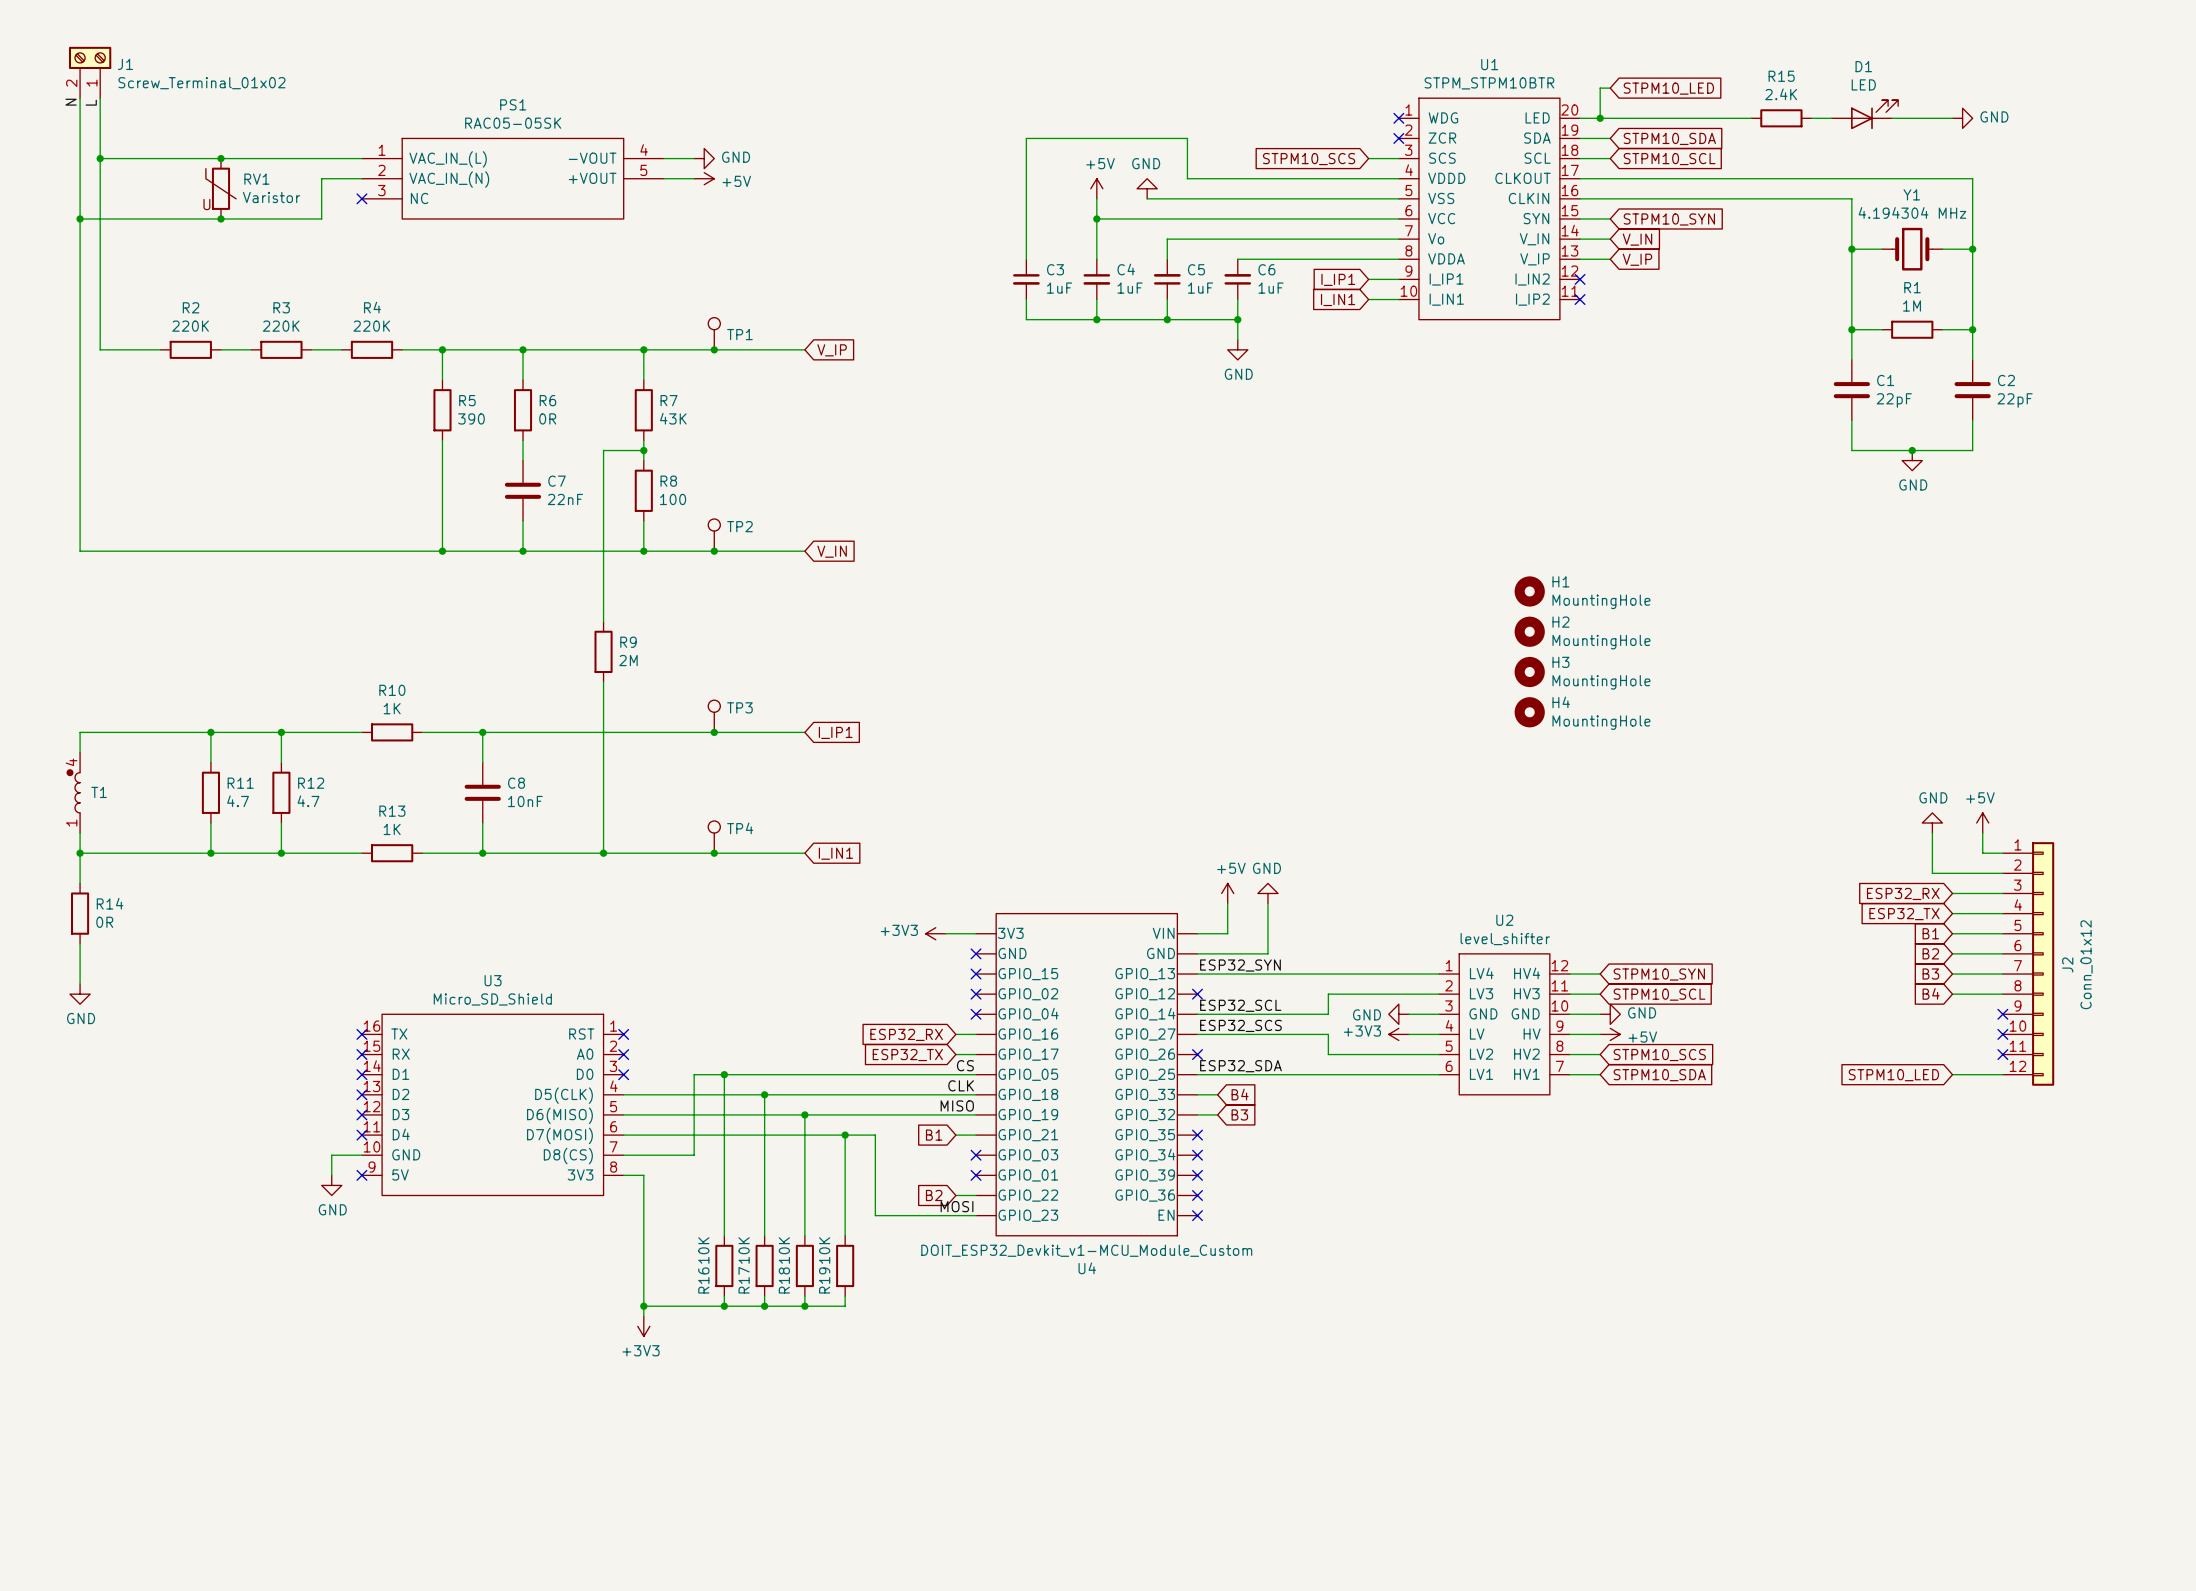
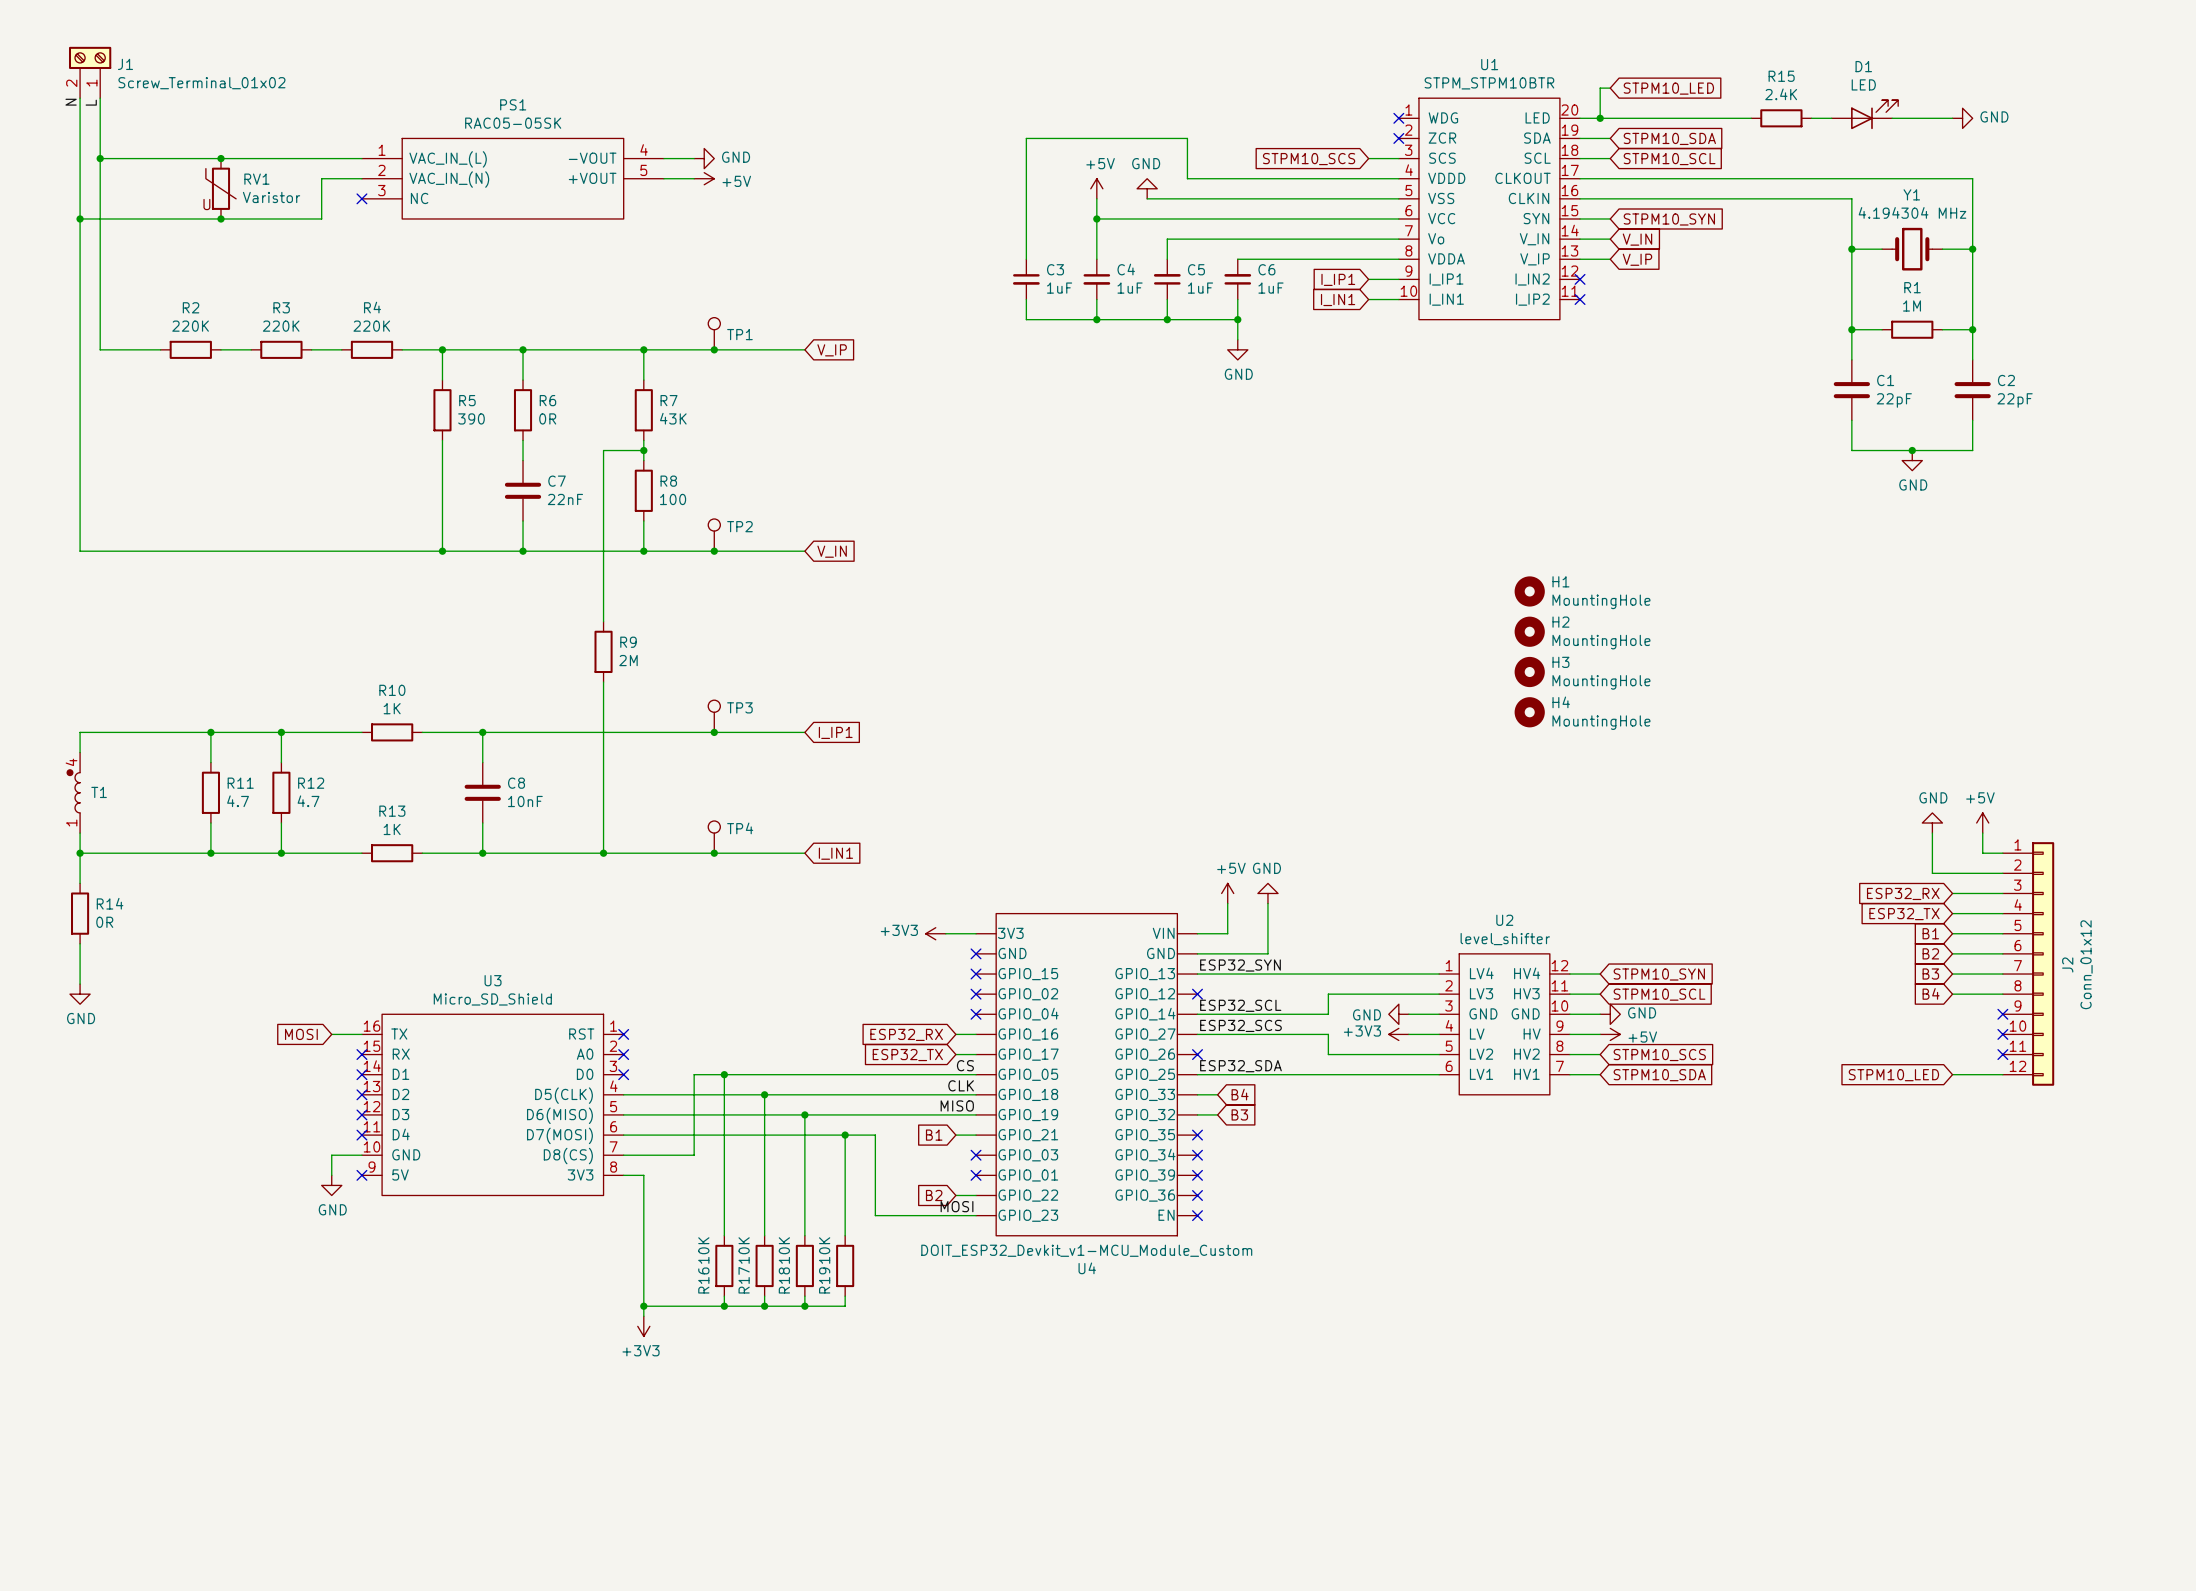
global label: none -> MOSI (301, 1034)
wire: none -> (331, 1034) (361, 1034)
no-connect mark: (361, 1034) -> none

